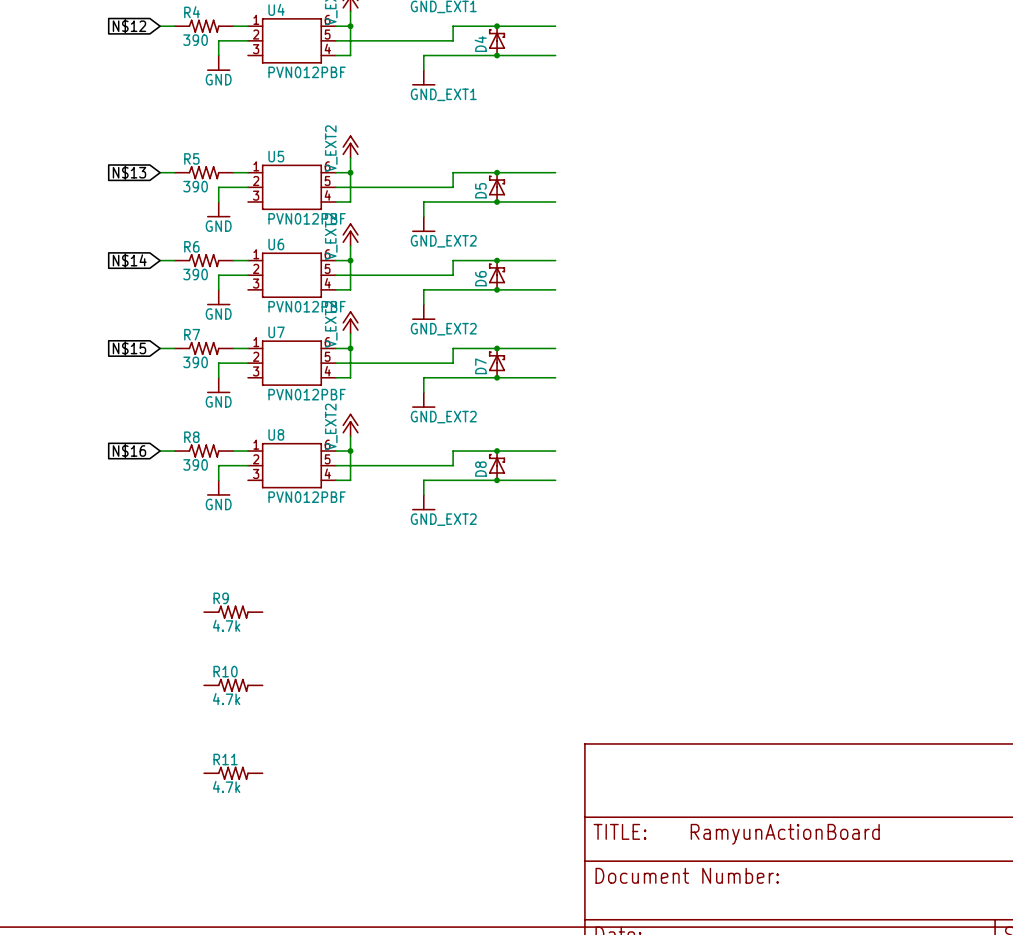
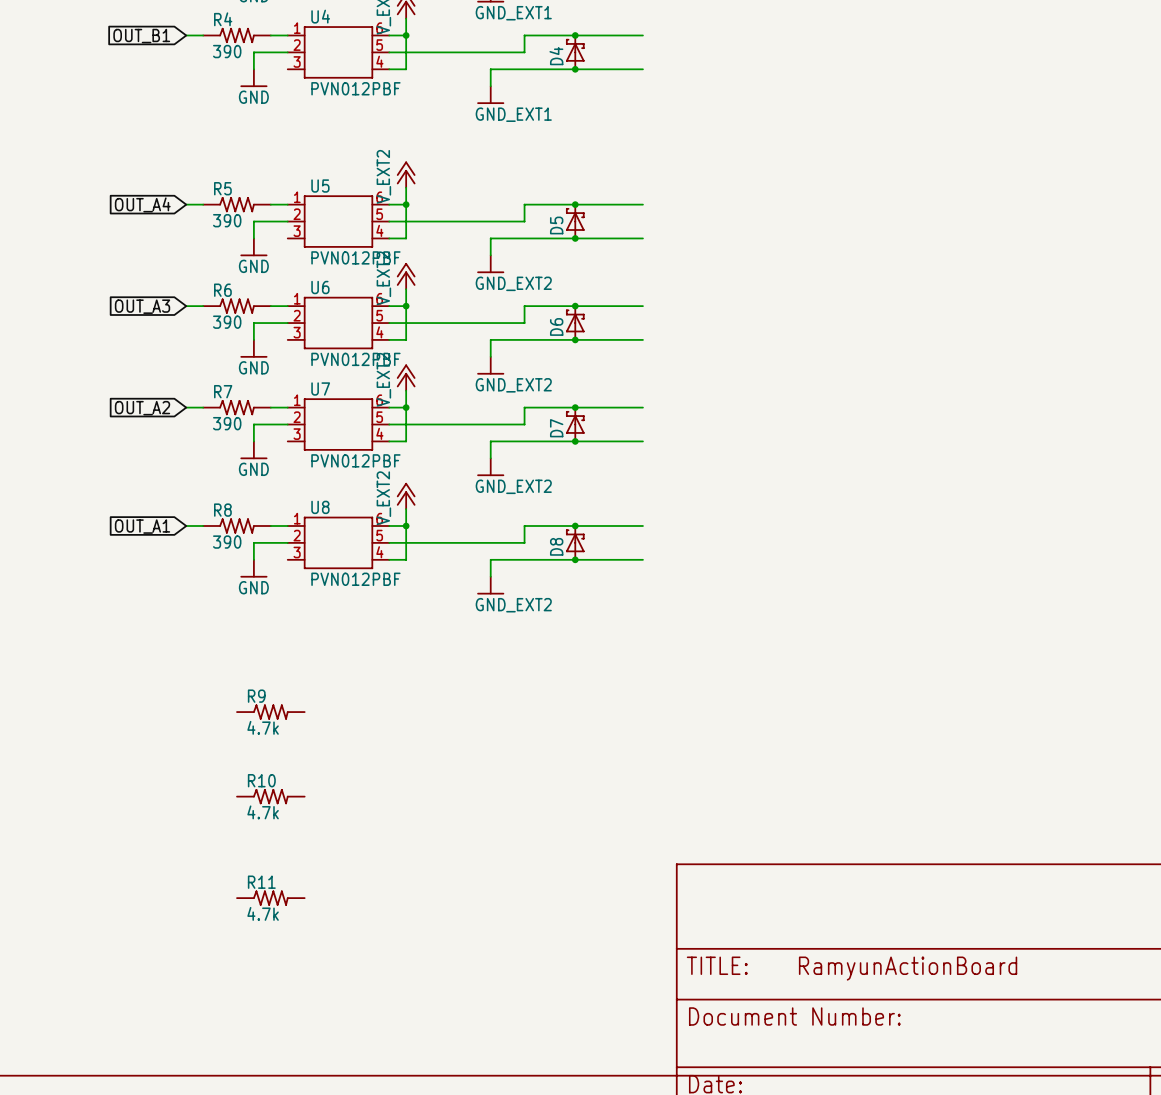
global label: N$12 (129, 26) -> OUT_B1 (141, 36)
global label: N$13 (129, 172) -> OUT_A4 (142, 204)
global label: N$14 (129, 260) -> OUT_A3 (142, 306)
global label: N$15 (129, 348) -> OUT_A2 (142, 408)
global label: N$16 (129, 451) -> OUT_A1 (142, 526)

